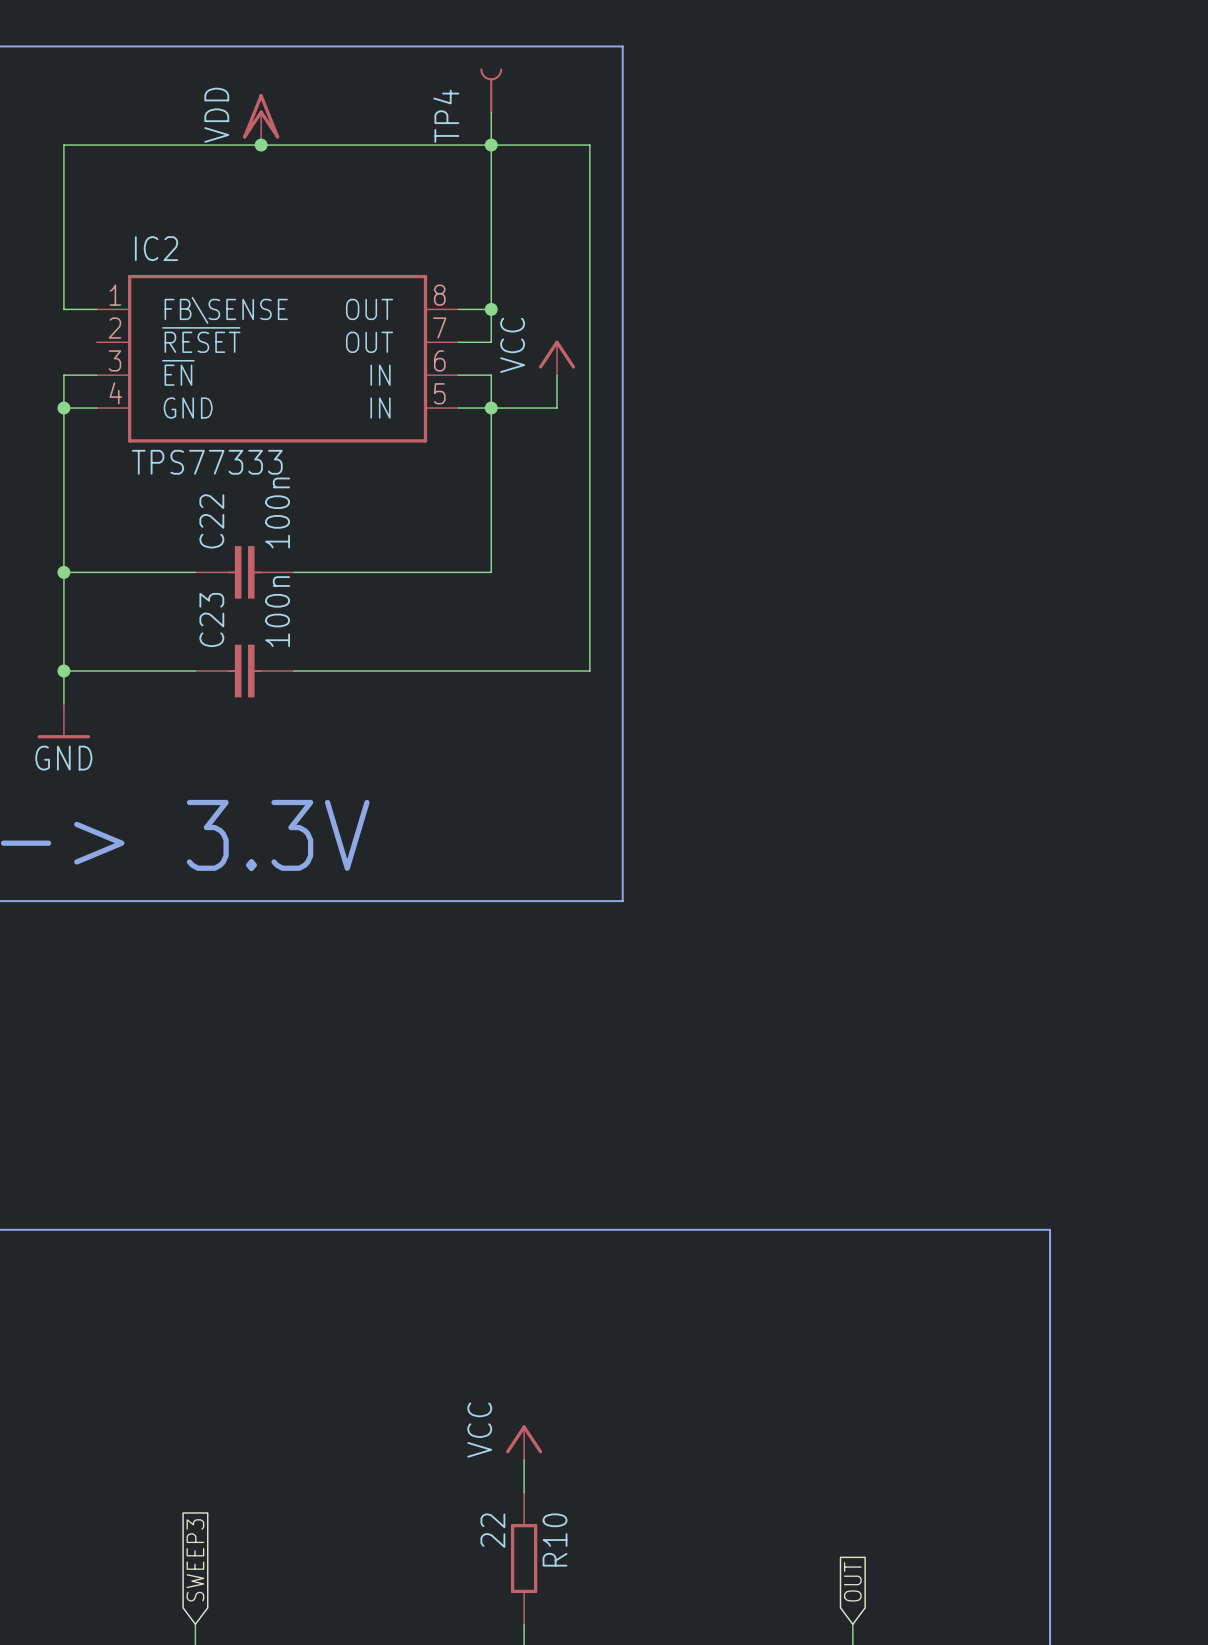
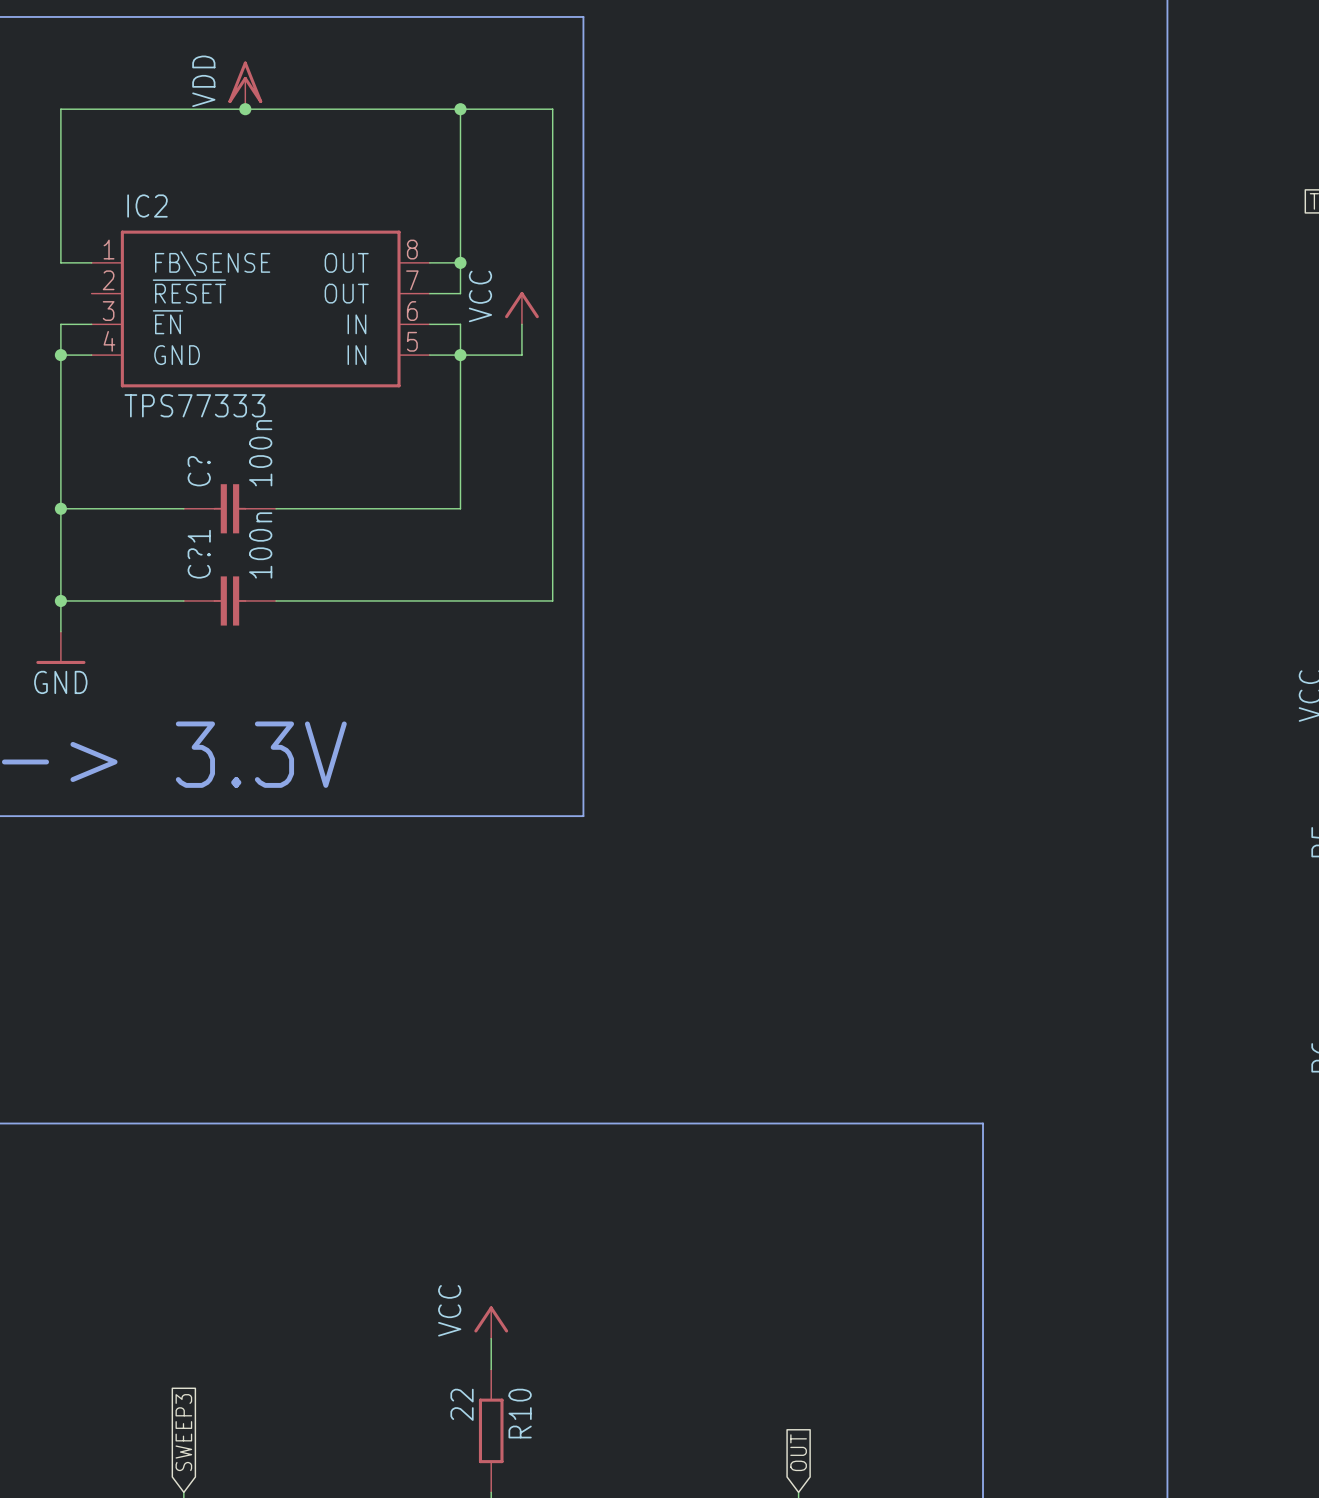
TP4: (491, 90) -> none
wire: (491, 112) (491, 145) -> none
C22 name: C22 (211, 521) -> C? (199, 471)
C23 name: C23 (211, 619) -> C?1 (199, 554)

